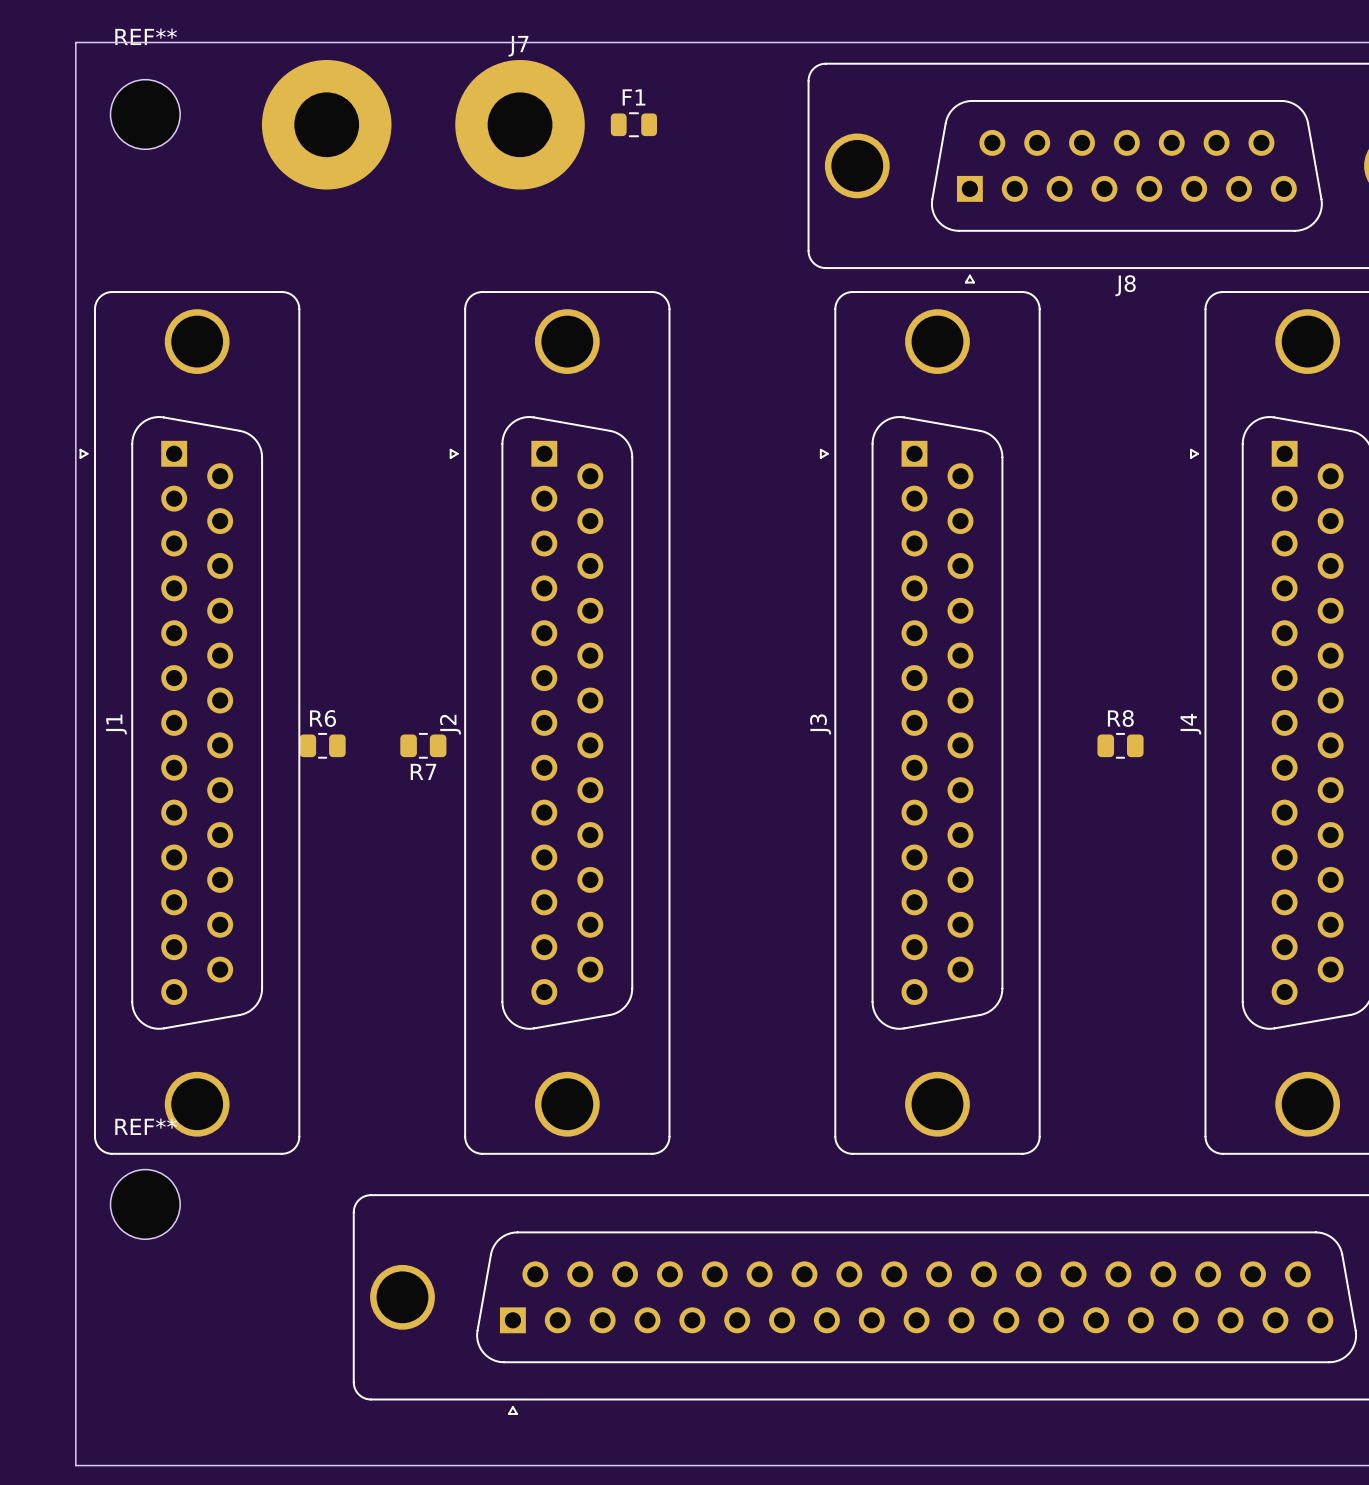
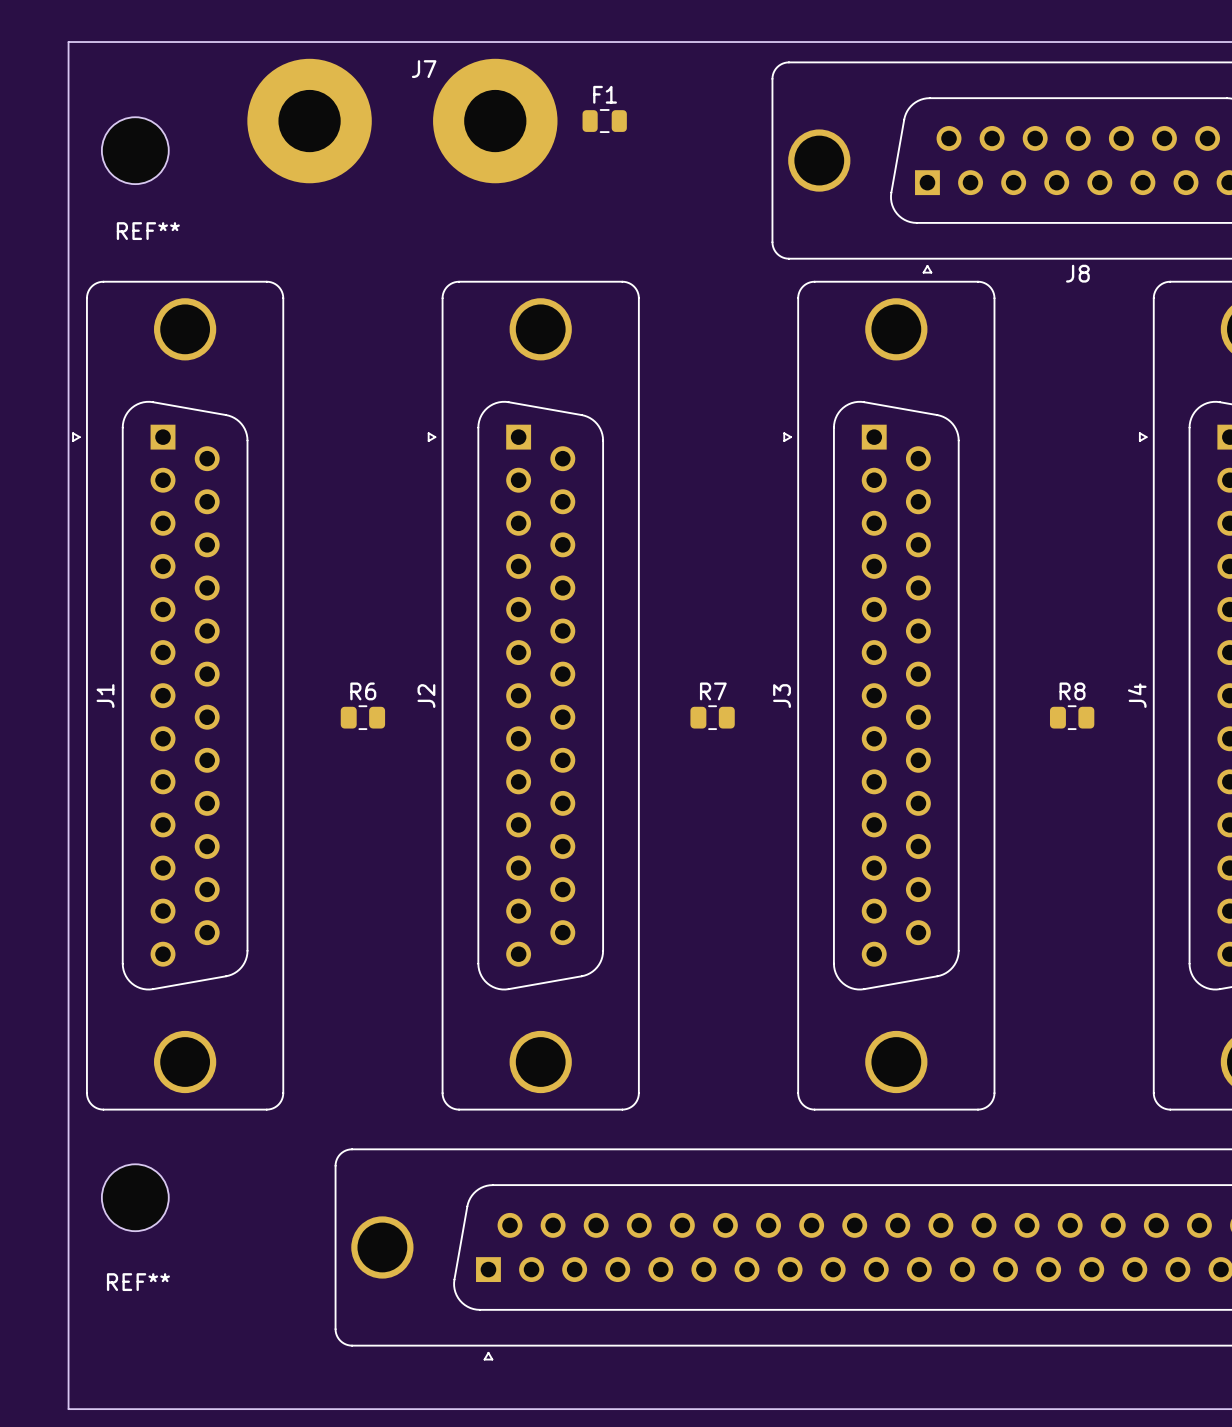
REF** name position: REF** (146, 36) -> REF** (148, 231)
J7 name position: J7 (518, 46) -> J7 (424, 69)
REF** position: (145, 114) -> (135, 150)
R6 position: (322, 745) -> (362, 717)
R7 position: (423, 745) -> (712, 717)
R7 name position: R7 (423, 771) -> R7 (713, 691)
REF** name position: REF** (146, 1126) -> REF** (138, 1282)
REF** position: (145, 1204) -> (135, 1197)

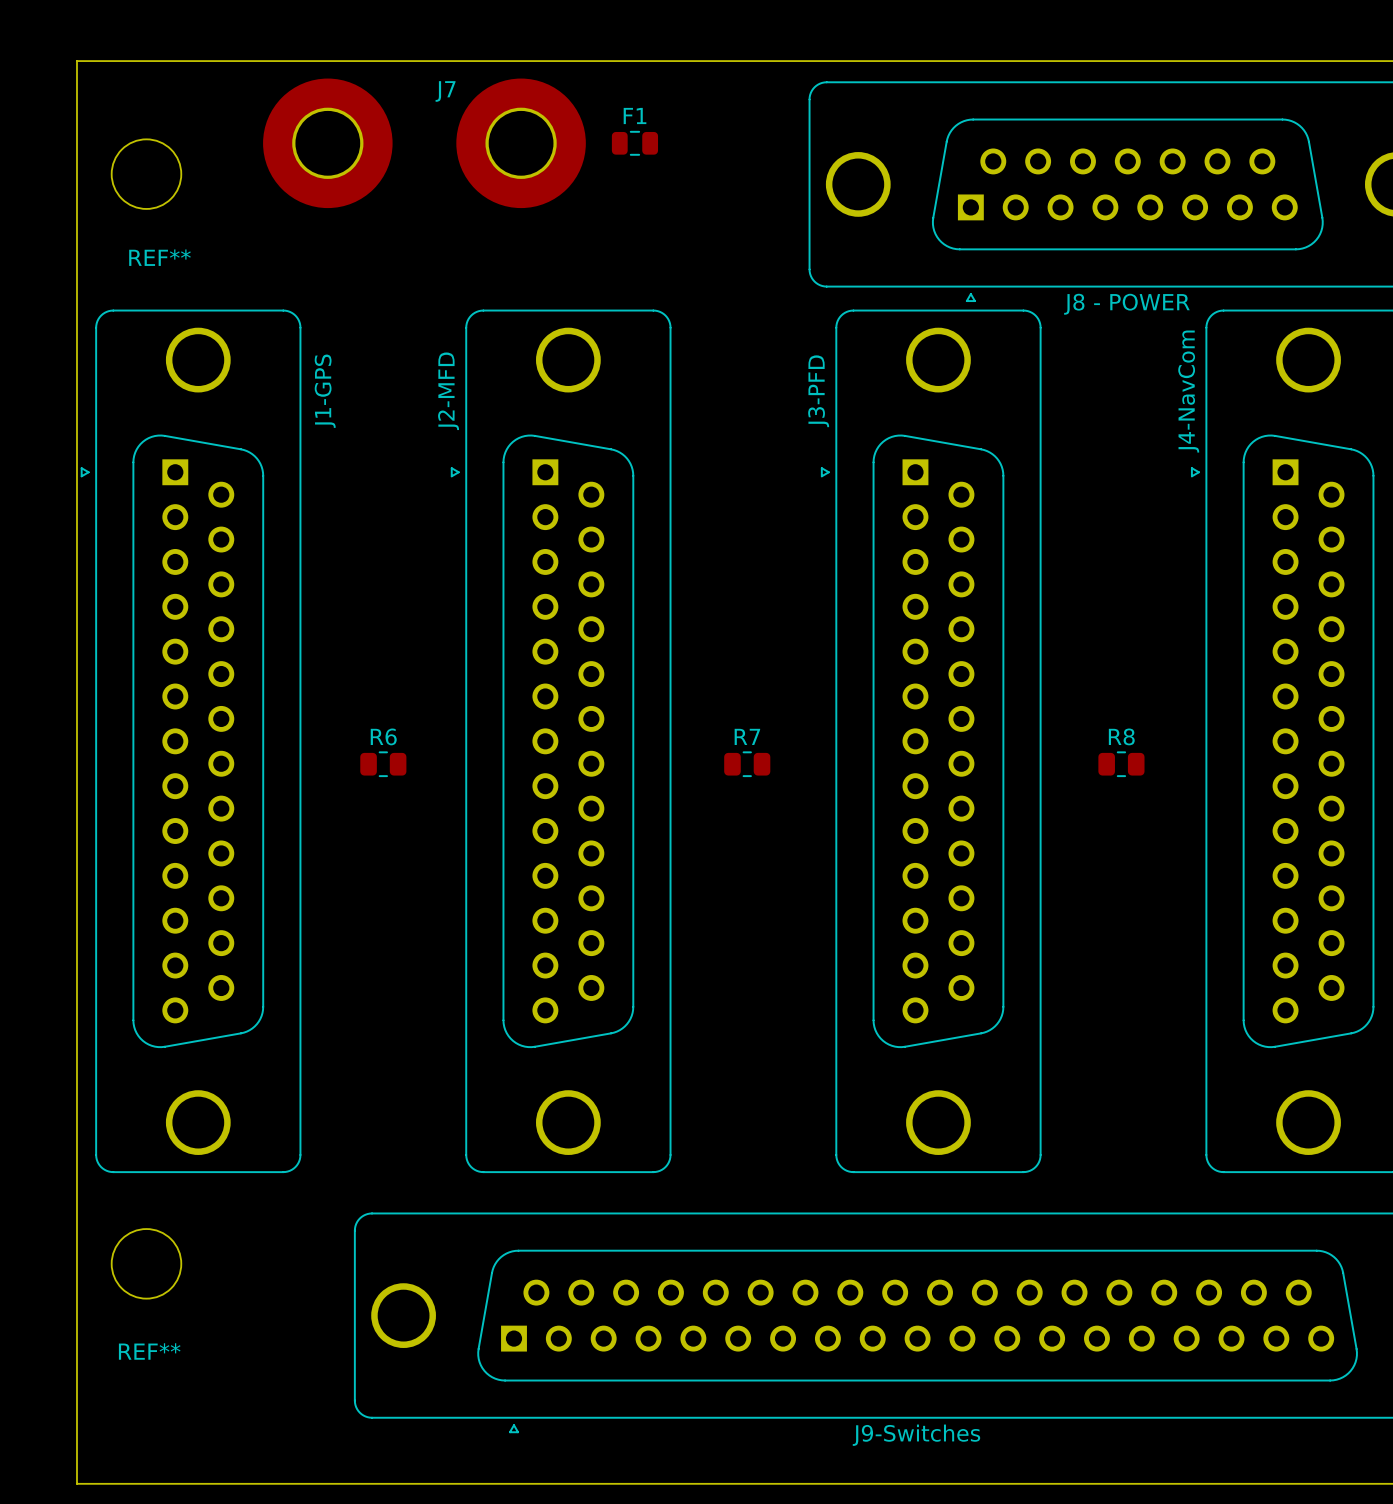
J8 name: J8 (1077, 273) -> J8 - POWER (1126, 304)
J4 name: J4 (1137, 695) -> J4-NavCom (1188, 391)
J1 name: J1 (105, 696) -> J1-GPS (325, 391)
J2 name: J2 (426, 696) -> J2-MFD (448, 391)
J3 name: J3 (782, 696) -> J3-PFD (818, 391)
J9-Switches name: none -> J9-Switches (916, 1435)

